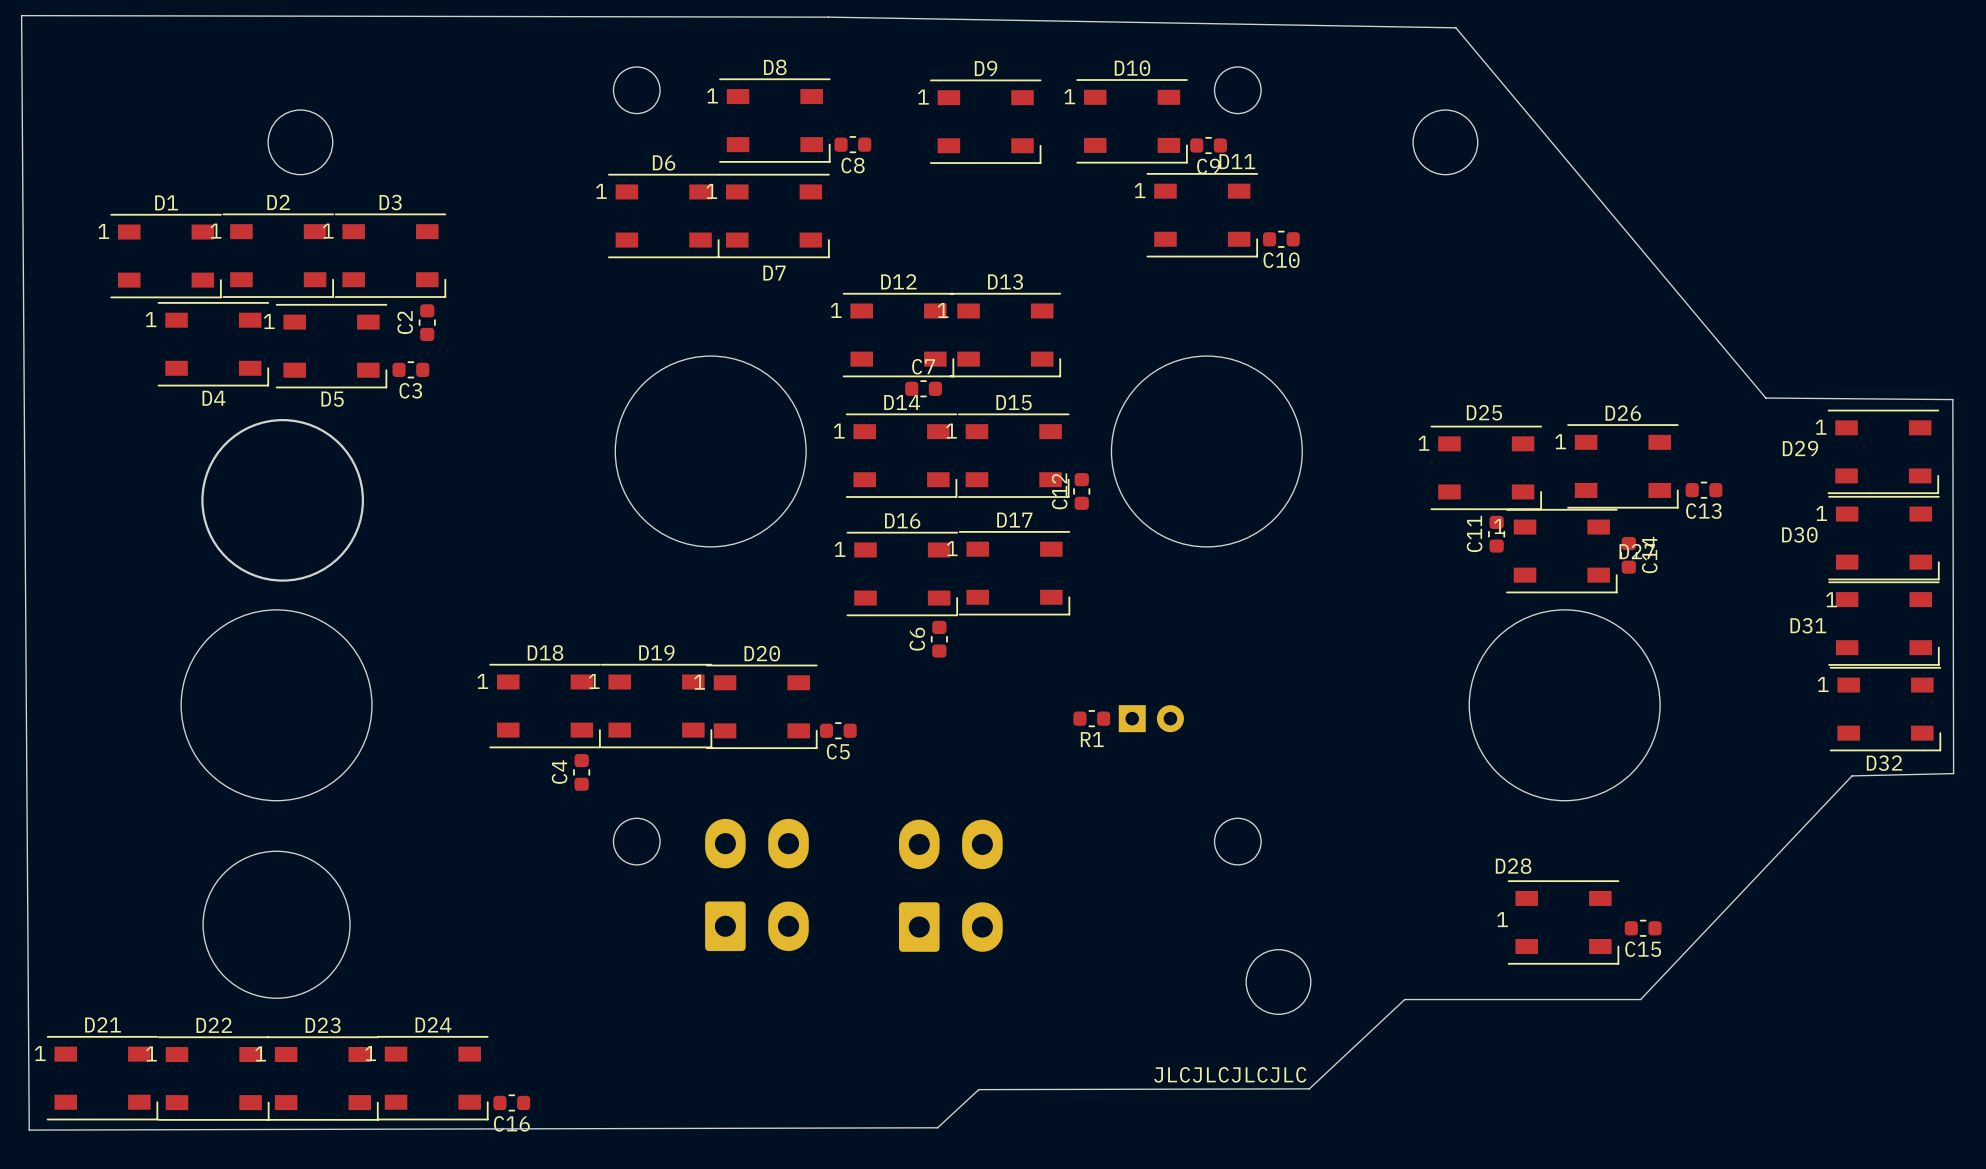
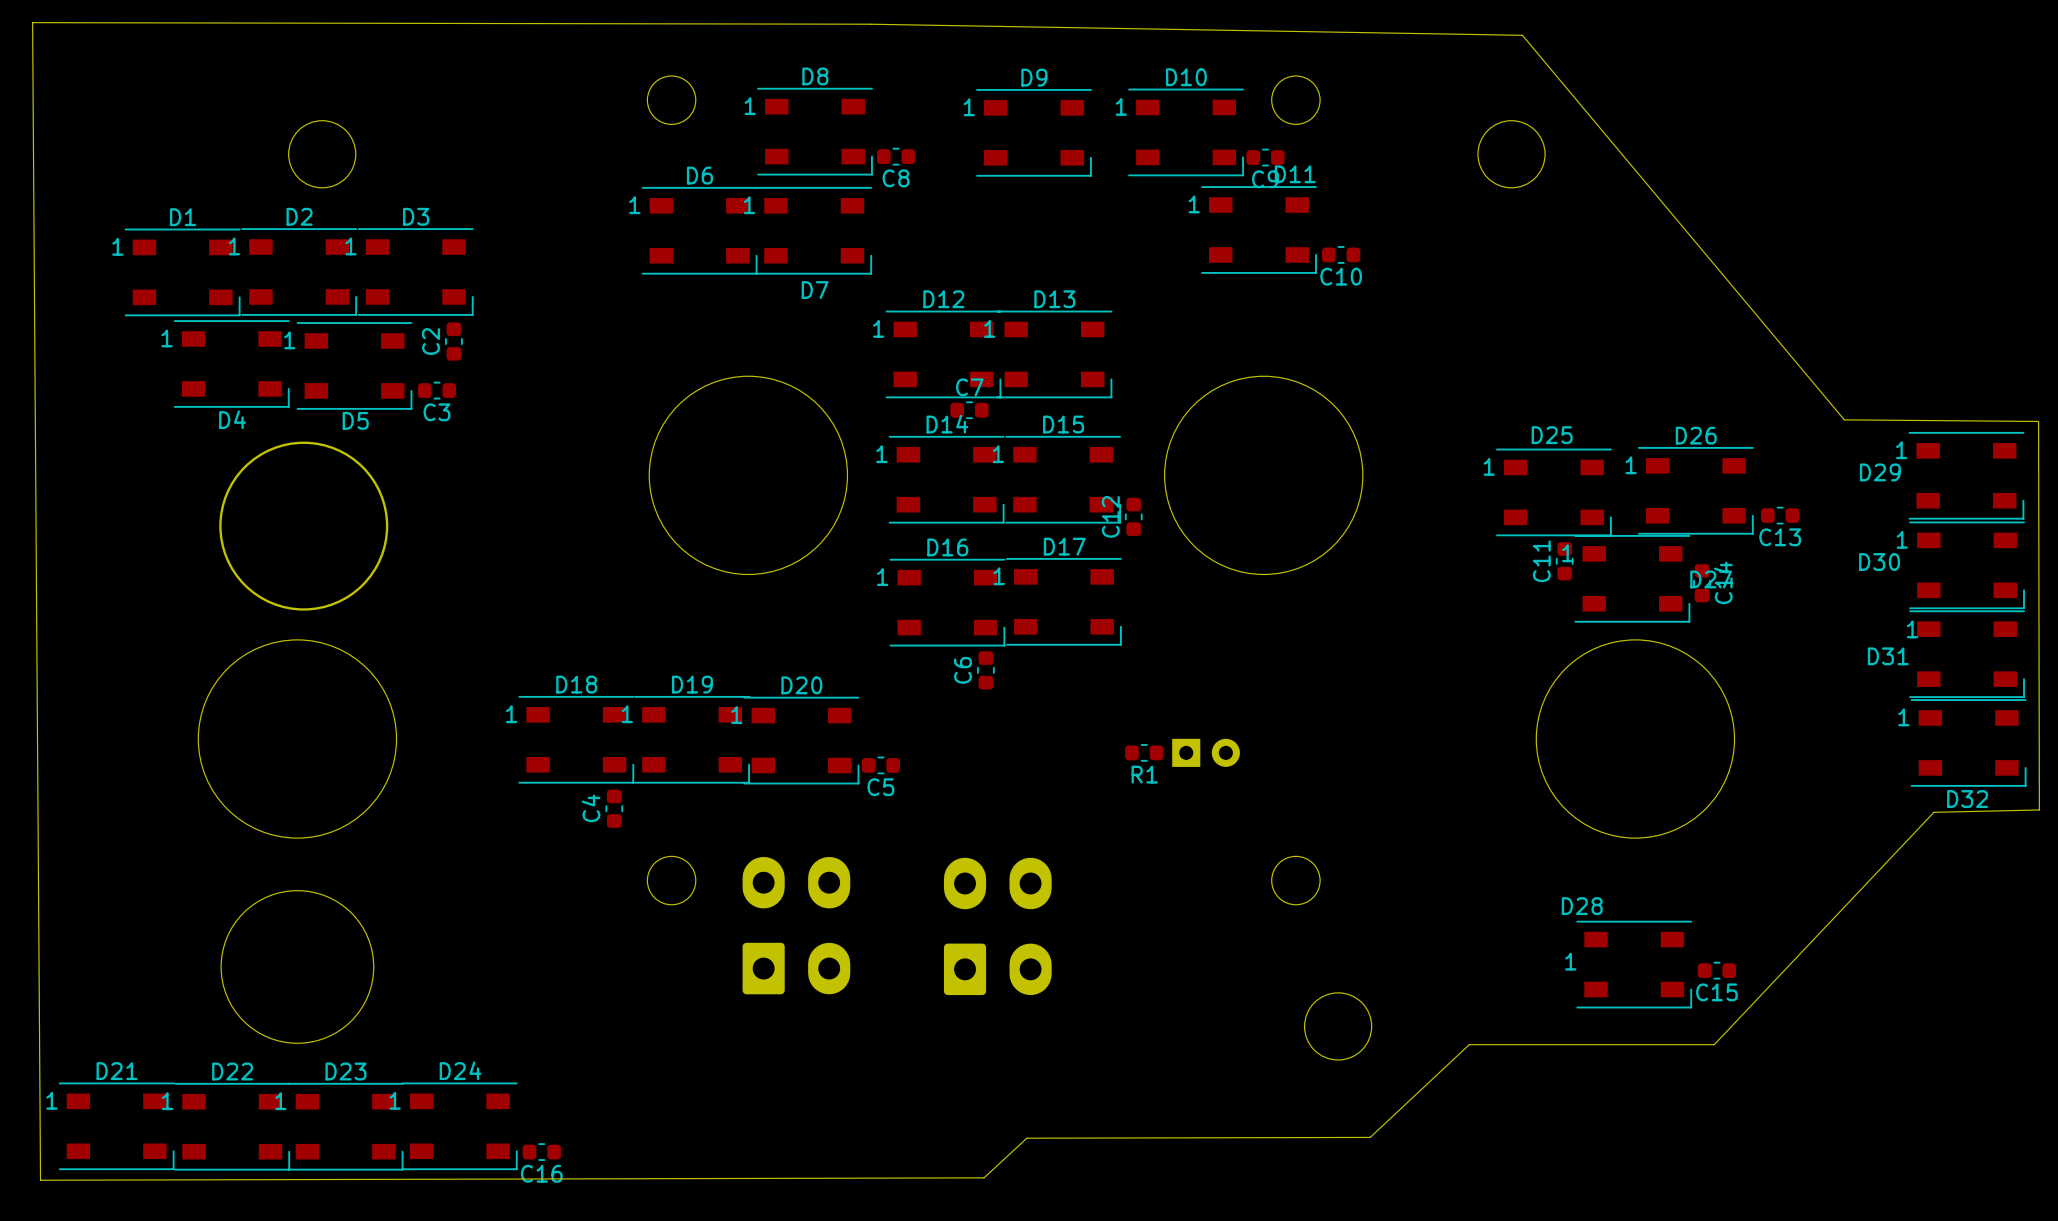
text: JLCJLCJLCJLC (1230, 1074) -> none

